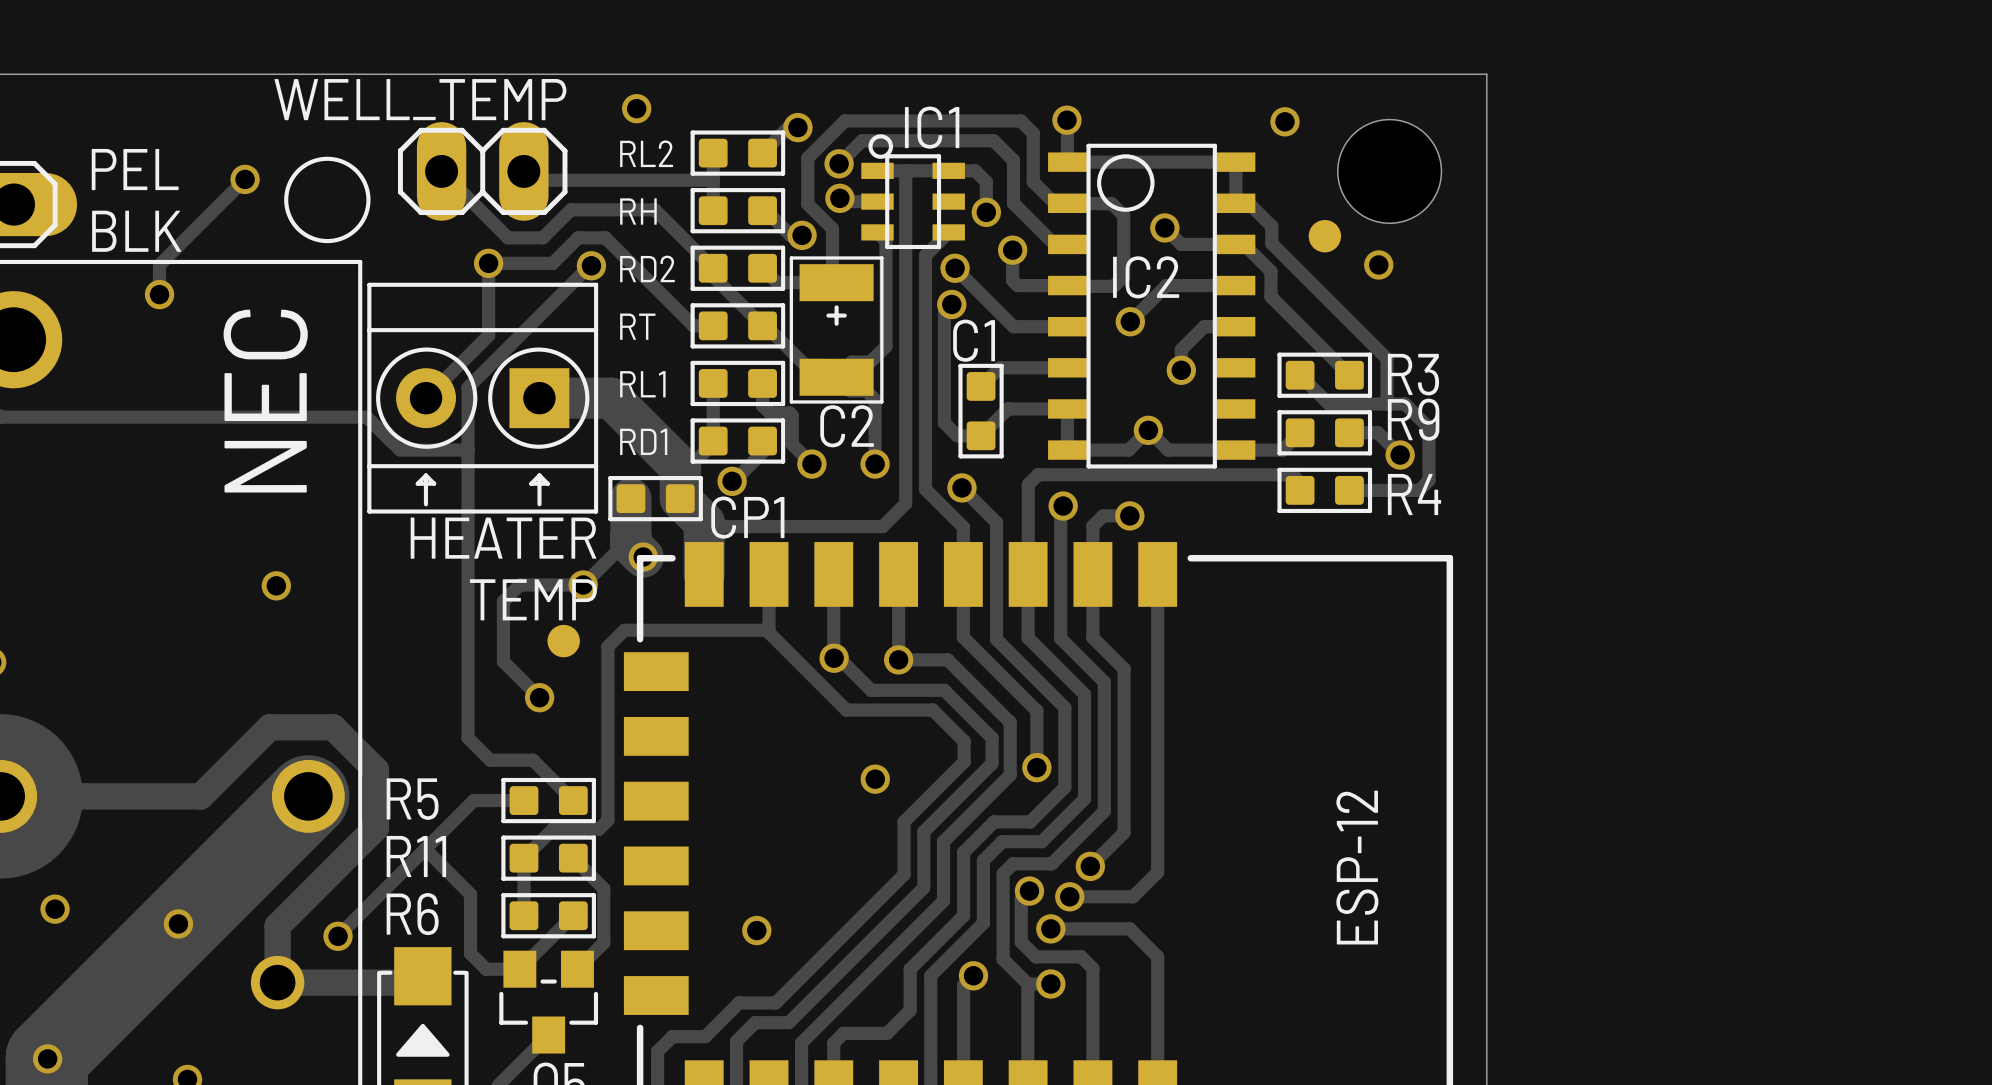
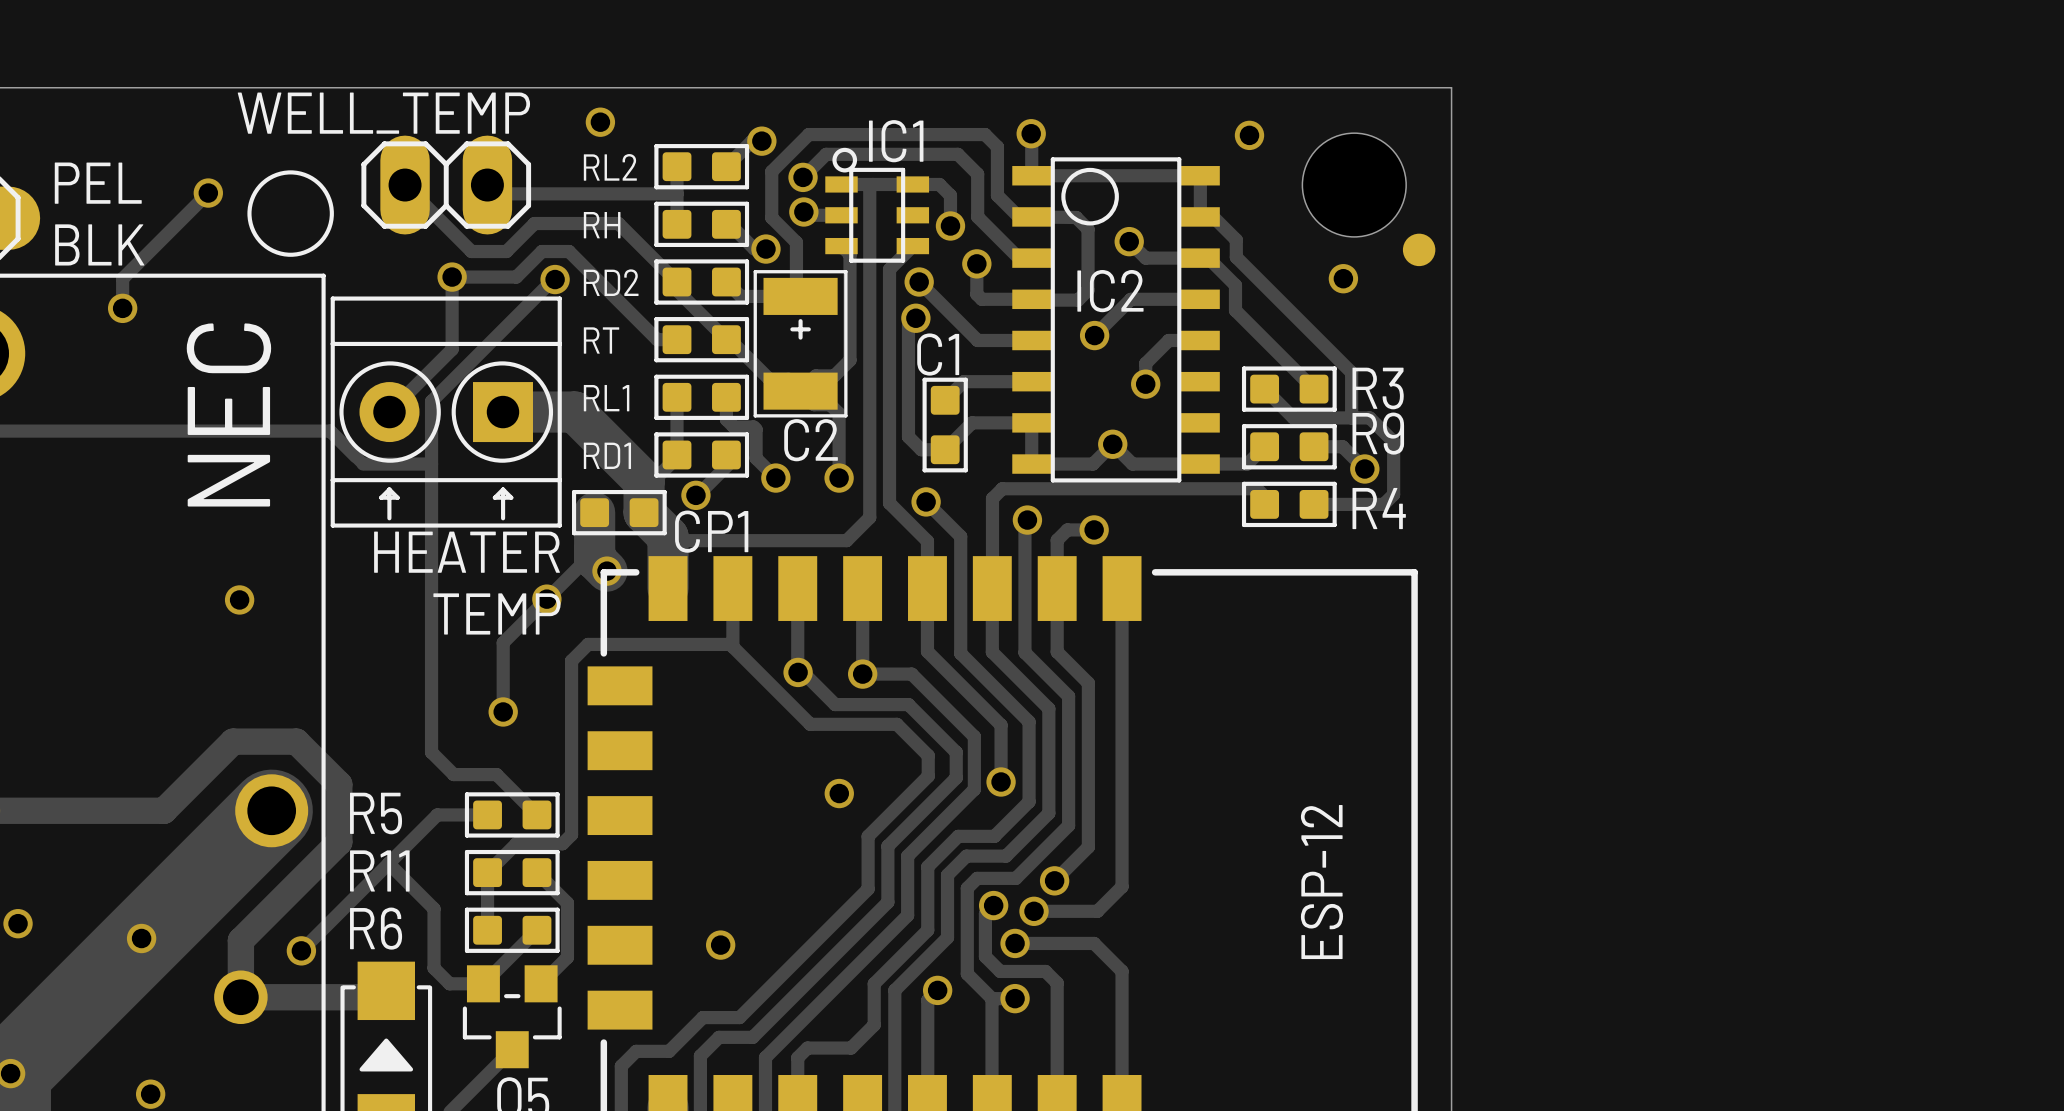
part position: (1324, 236) -> (1419, 249)
track: (583, 585) (519, 585) (503, 601) (503, 661) (539, 697) -> (546, 599) (503, 642) (503, 711)
part: (563, 641) -> none

